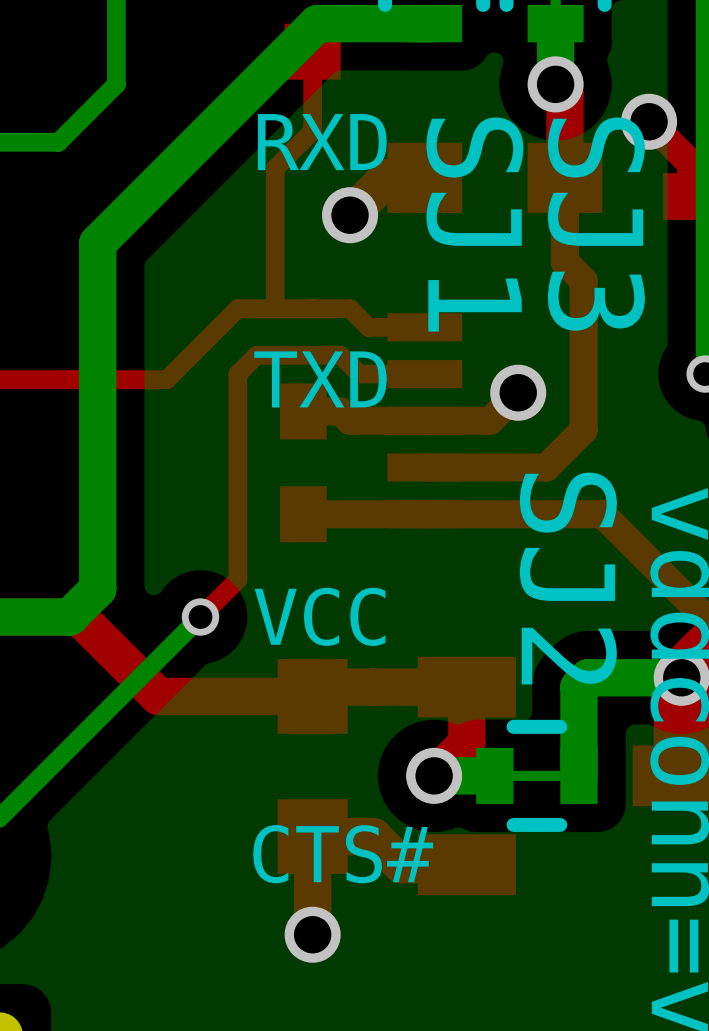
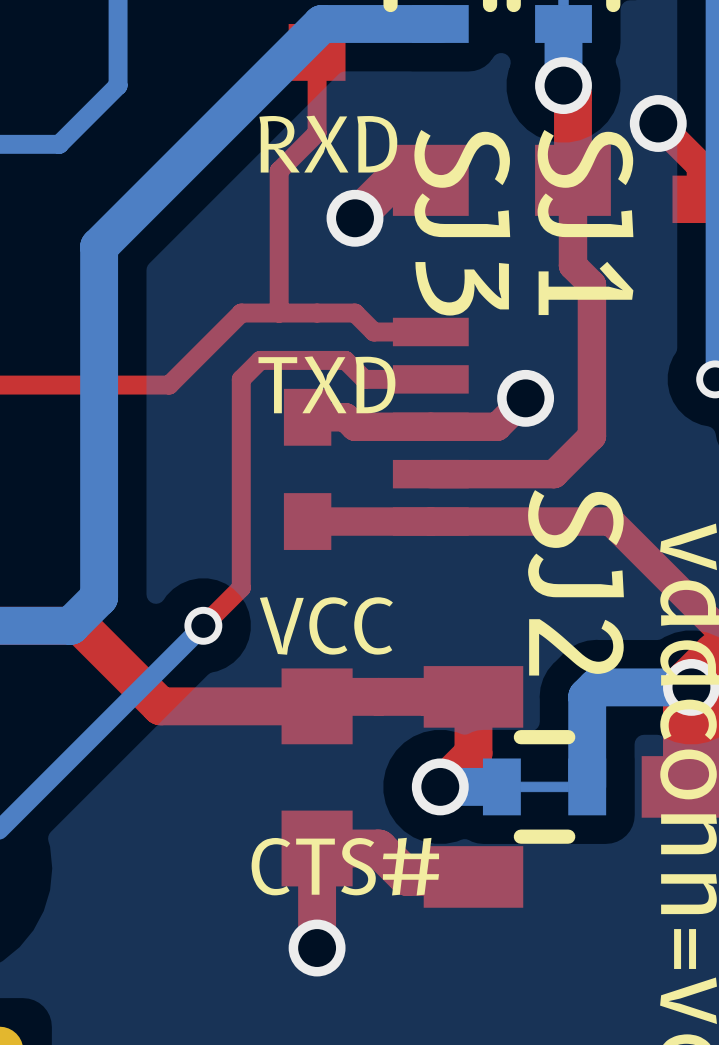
SJ1 name position: SJ1 (474, 224) -> SJ1 (585, 222)
SJ3 name position: SJ3 (596, 224) -> SJ3 (462, 222)

